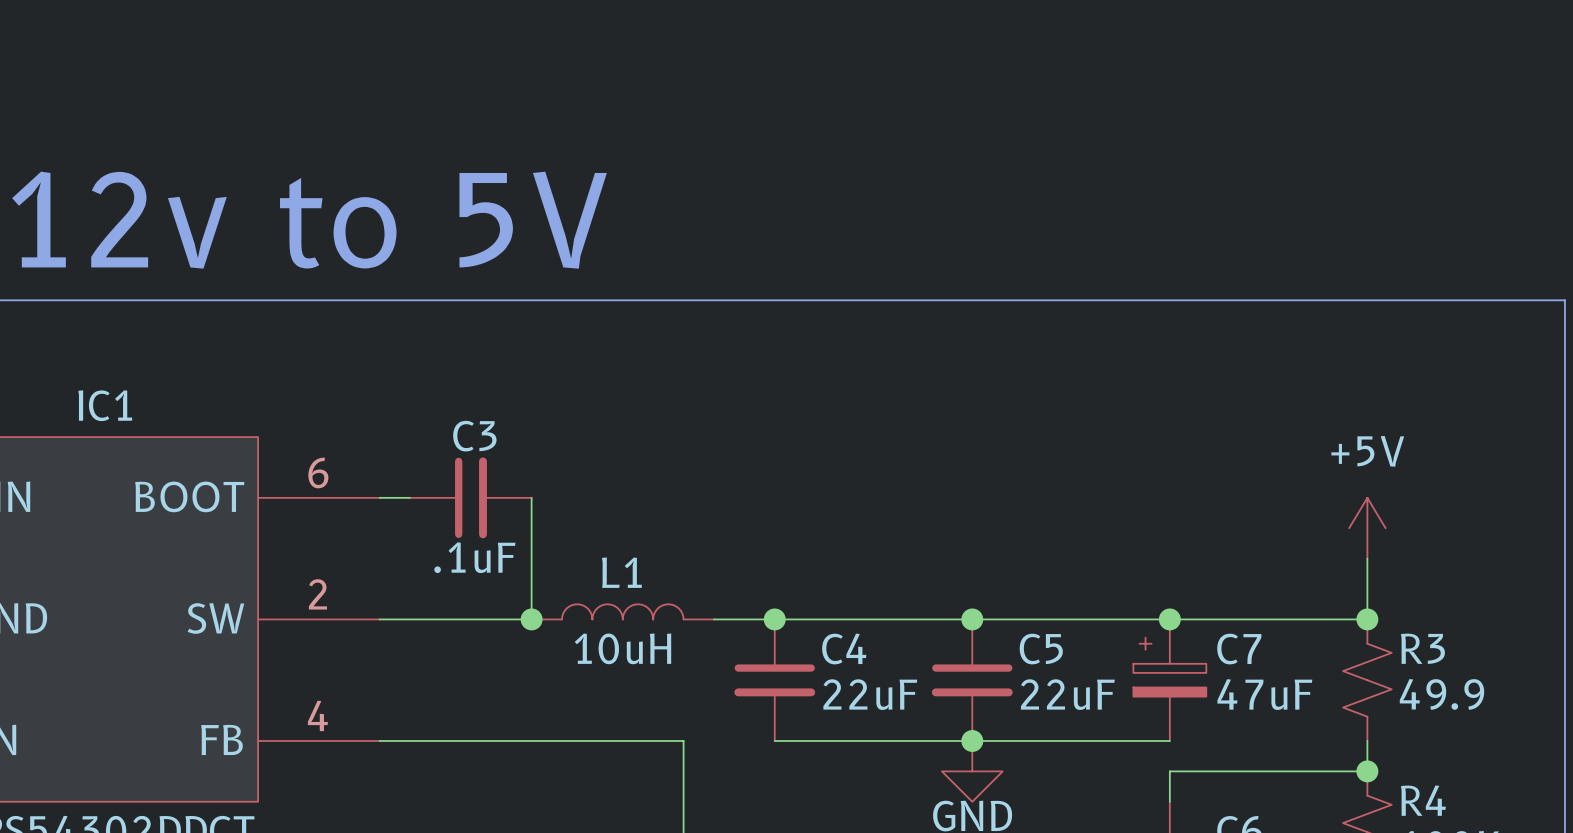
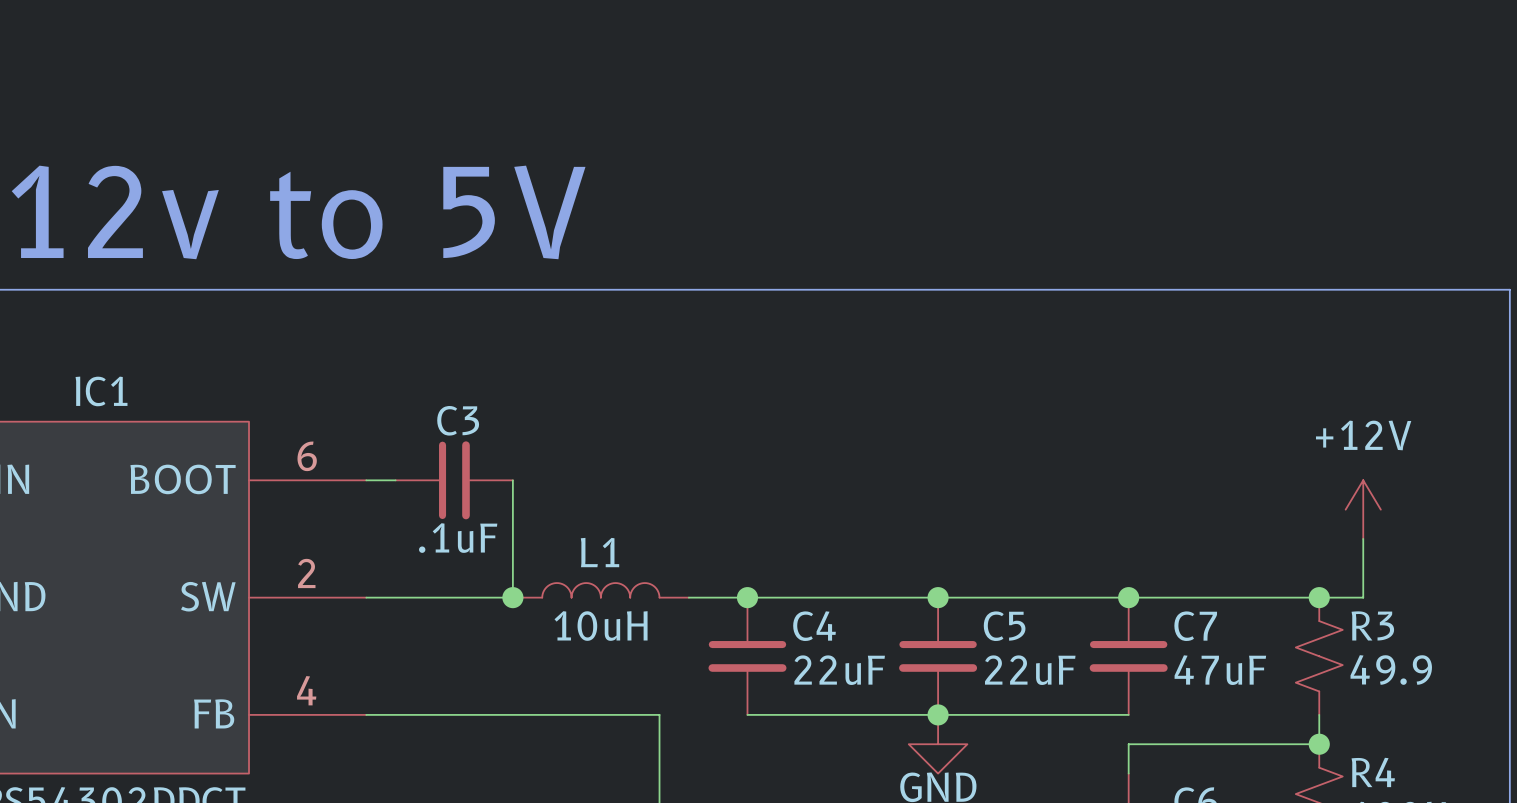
power symbol: +5V (1367, 528) -> none
power symbol: none -> +12V (1363, 509)
wire: (1367, 558) (1367, 619) -> (1363, 538) (1363, 597) (1319, 597)
C7 symbol: [1133, 619, 1207, 742] -> [1089, 597, 1168, 715]

